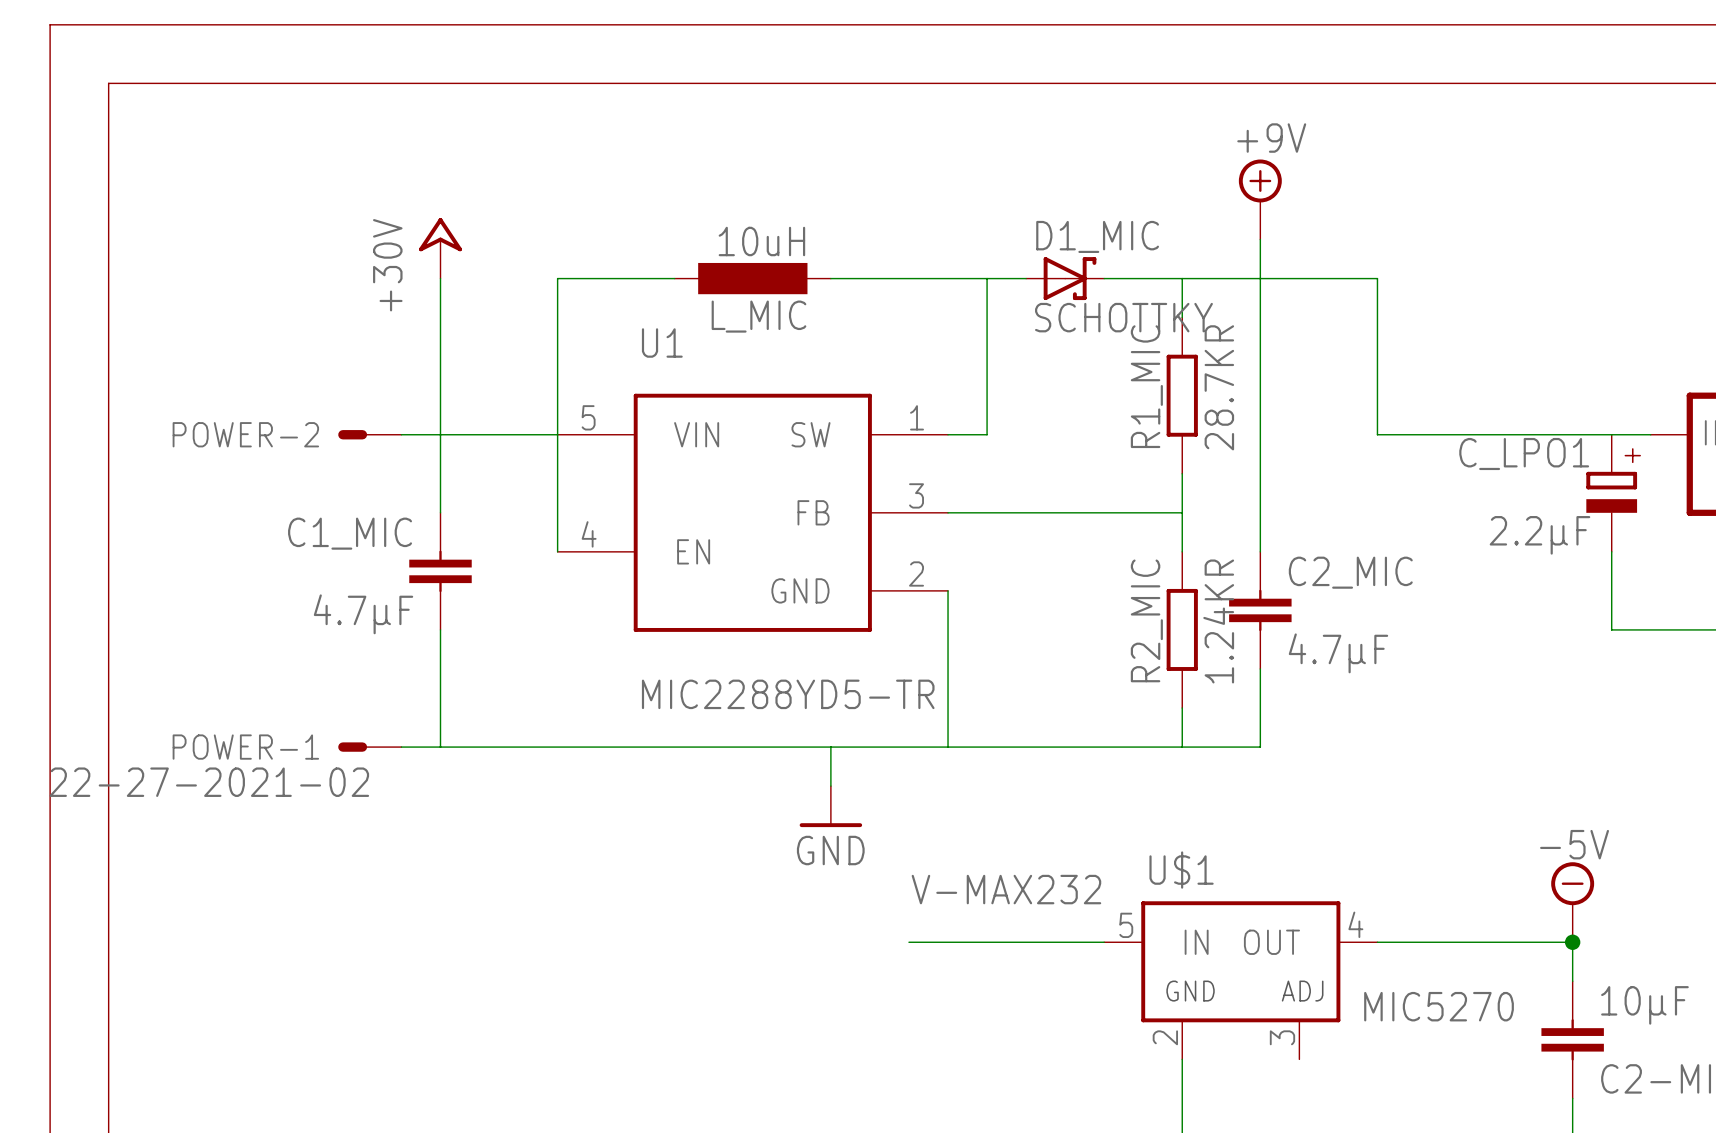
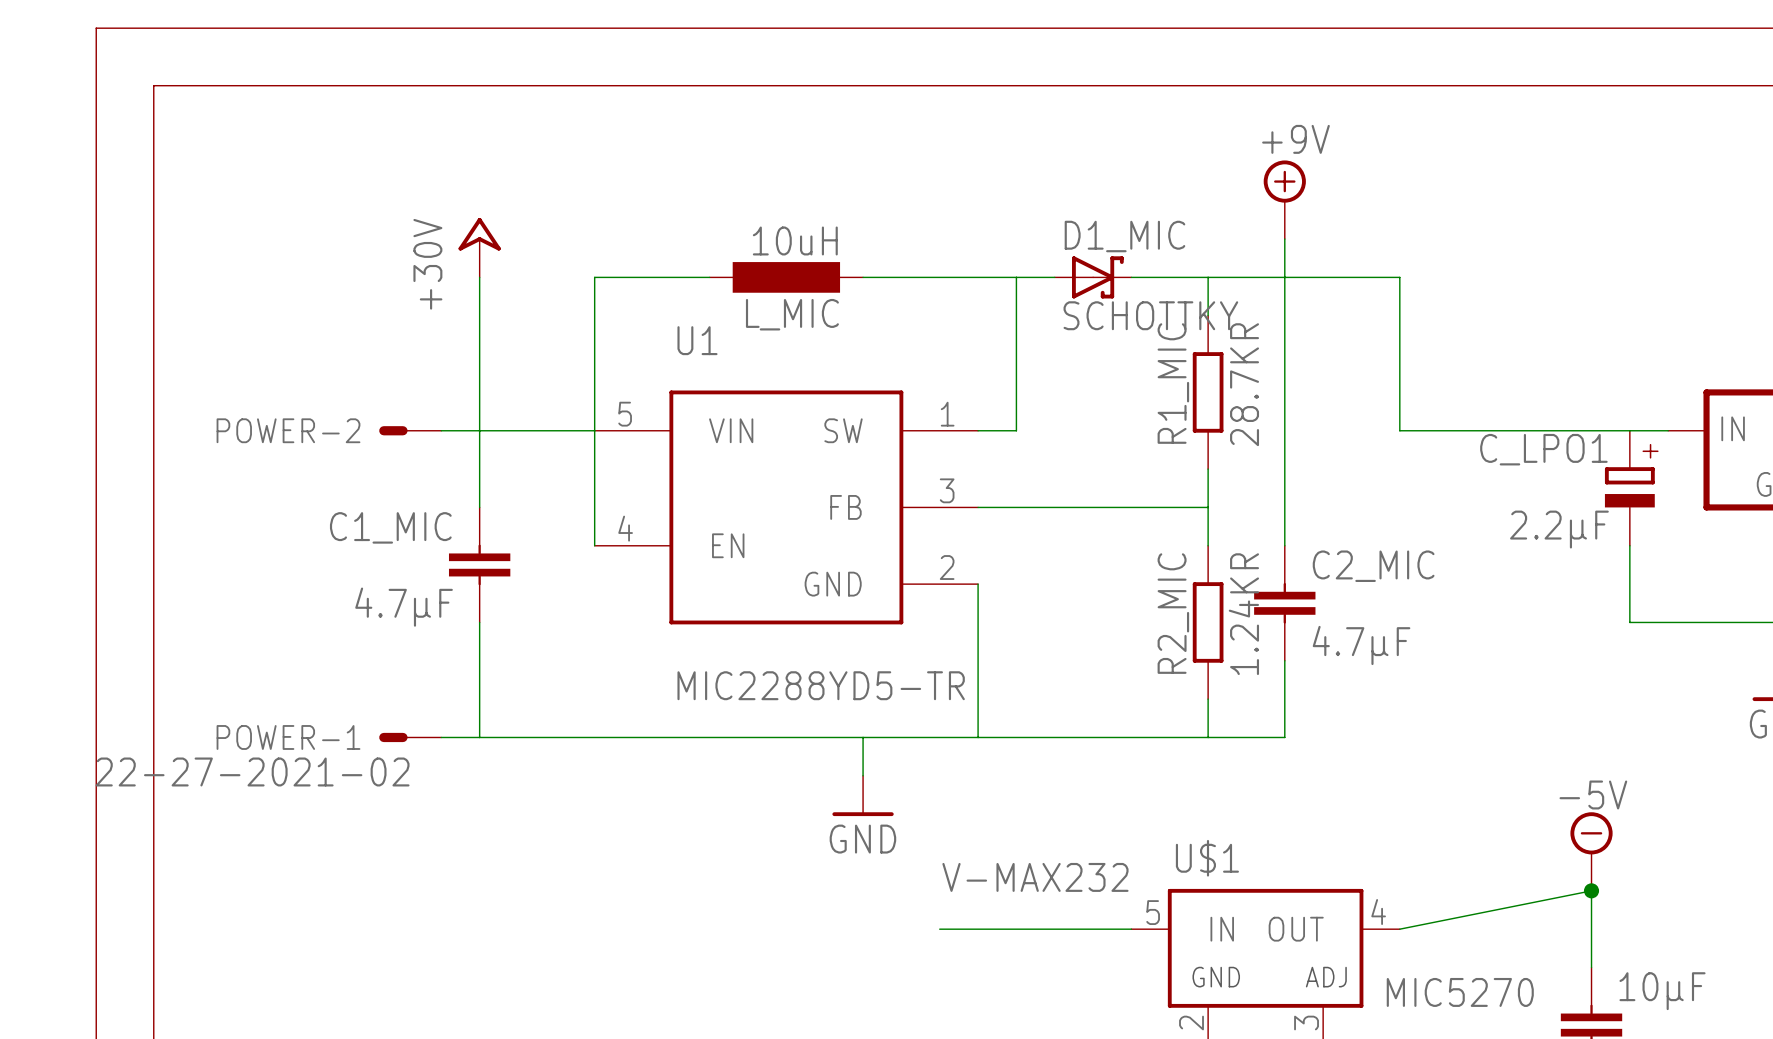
power symbol position: -5V (1572, 902) -> -5V (1591, 851)
wire: (1377, 942) (1572, 942) -> (1399, 929) (1591, 890) (1591, 929)
junction position: (1572, 942) -> (1591, 890)

